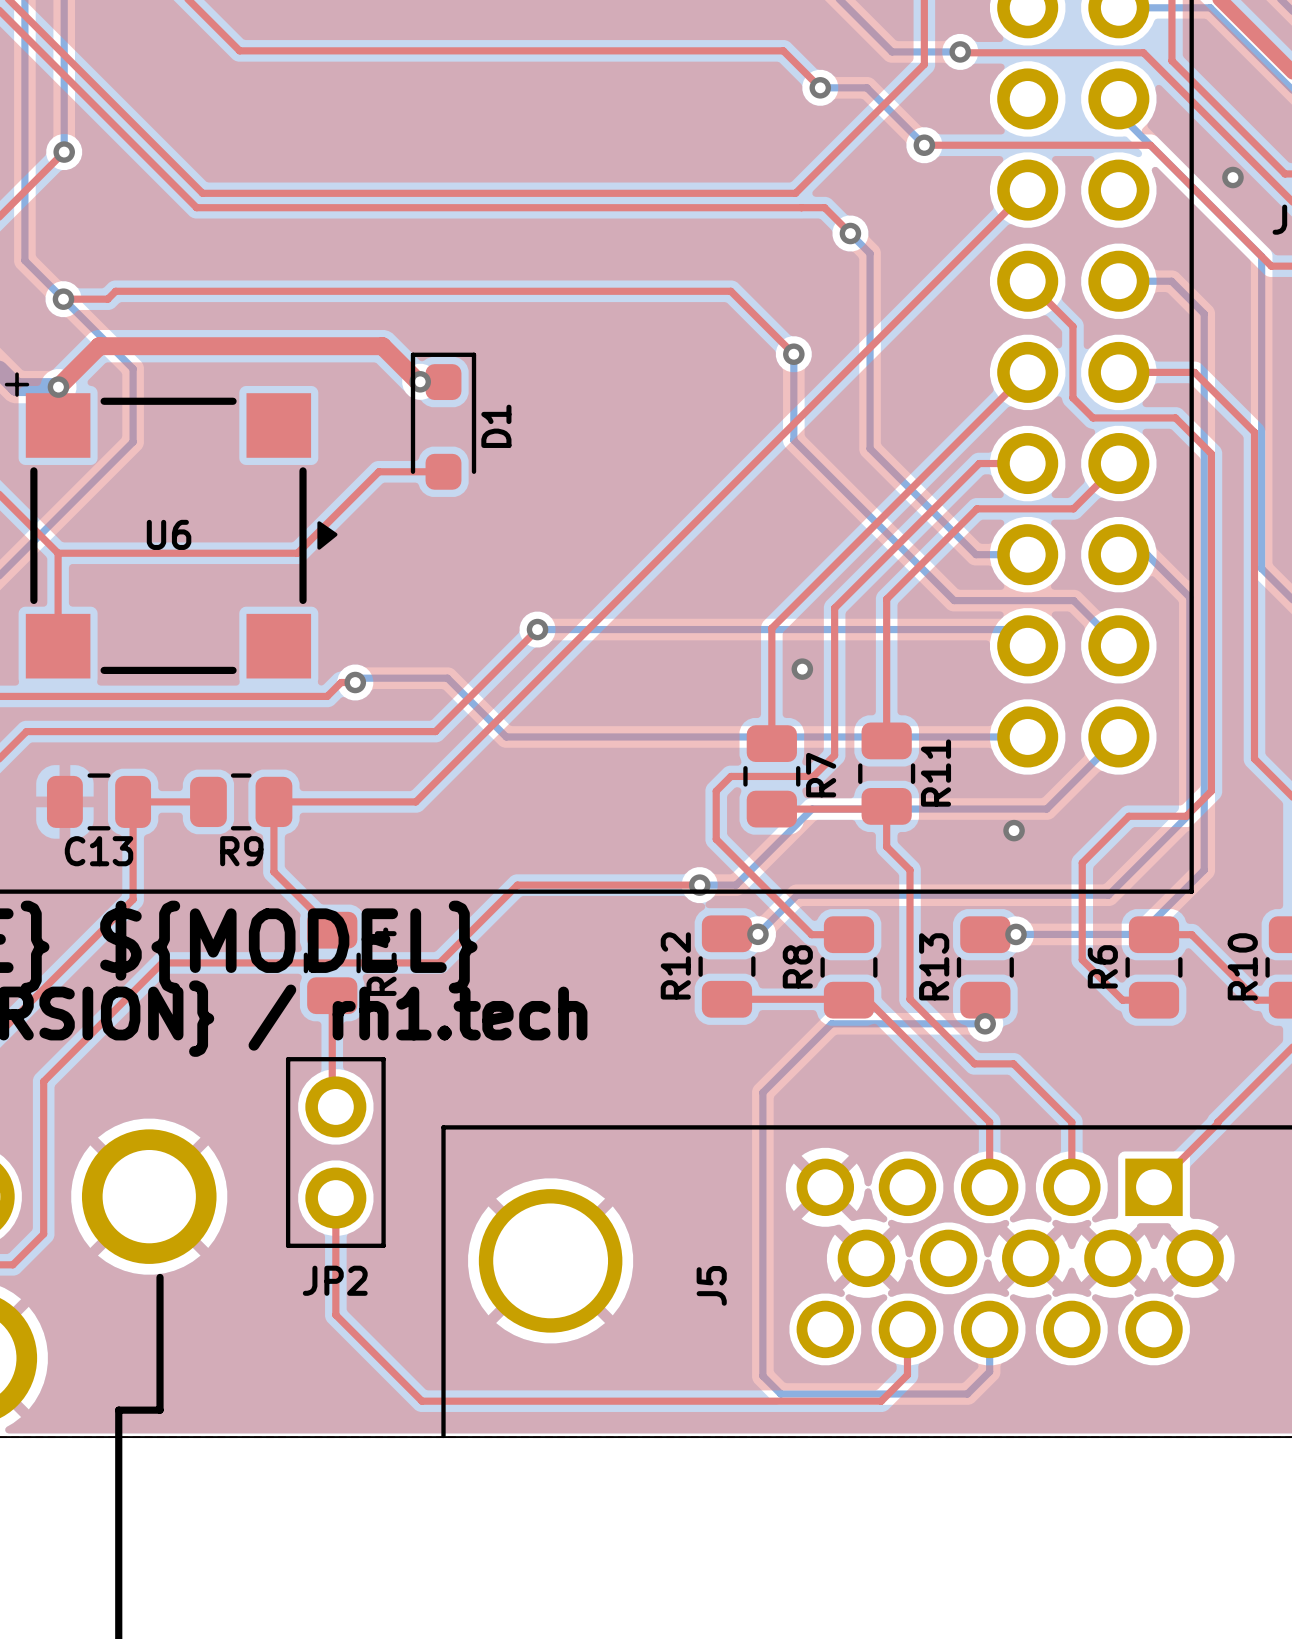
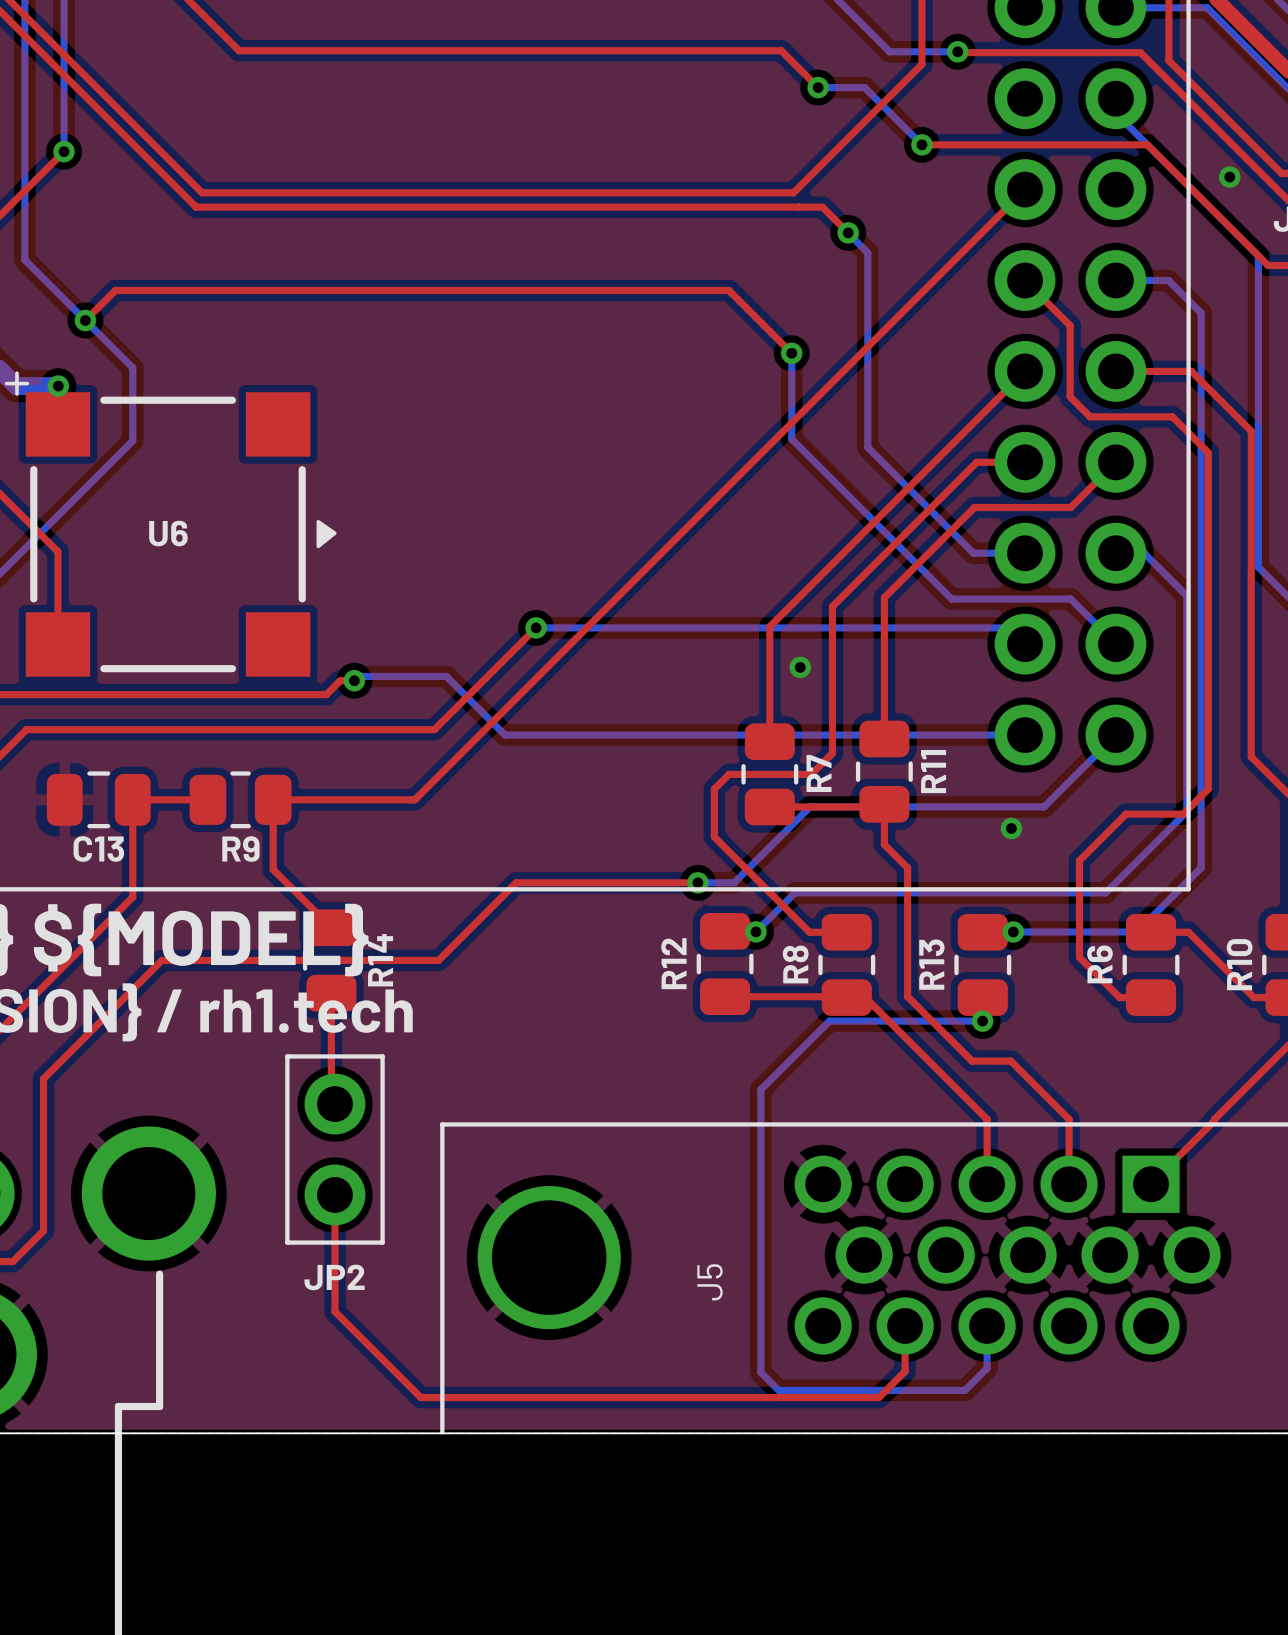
top track: (63, 299) (107, 299) -> (85, 320) (107, 298)
via position: (63, 299) -> (85, 320)
top track: (420, 381) (382, 346) (99, 346) (58, 387) -> none
via: (420, 381) -> none
D1: (443, 421) -> none
top track: (443, 471) (378, 471) (297, 553) (58, 553) -> none

